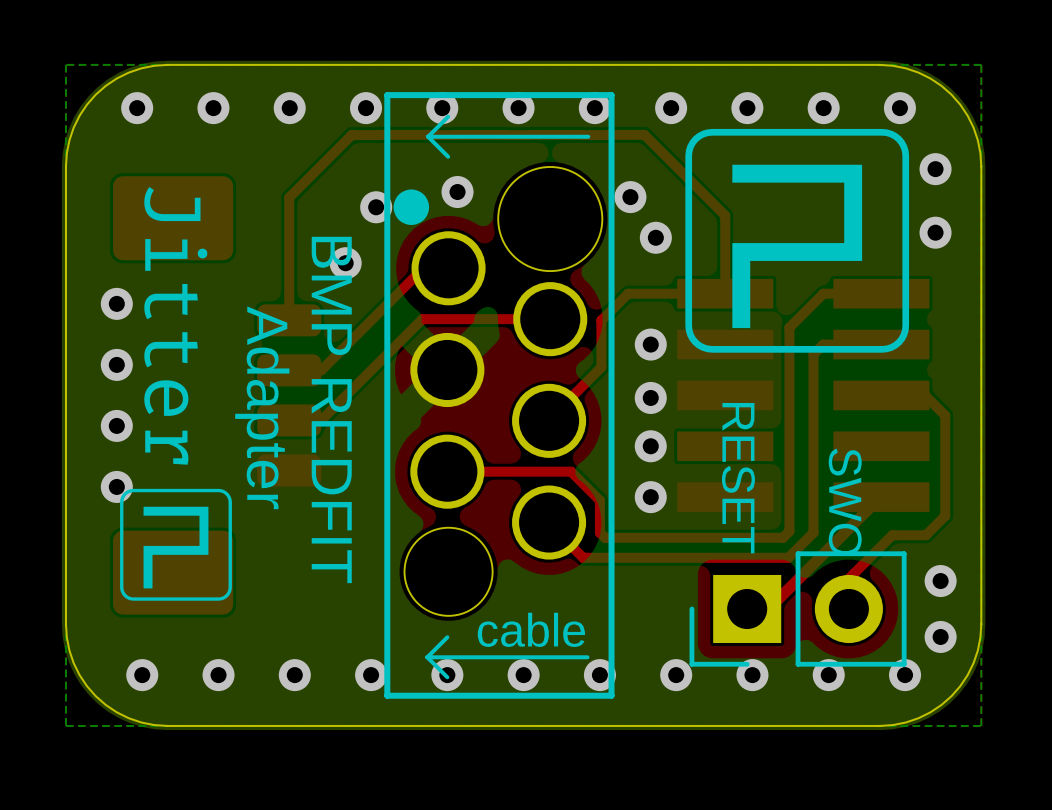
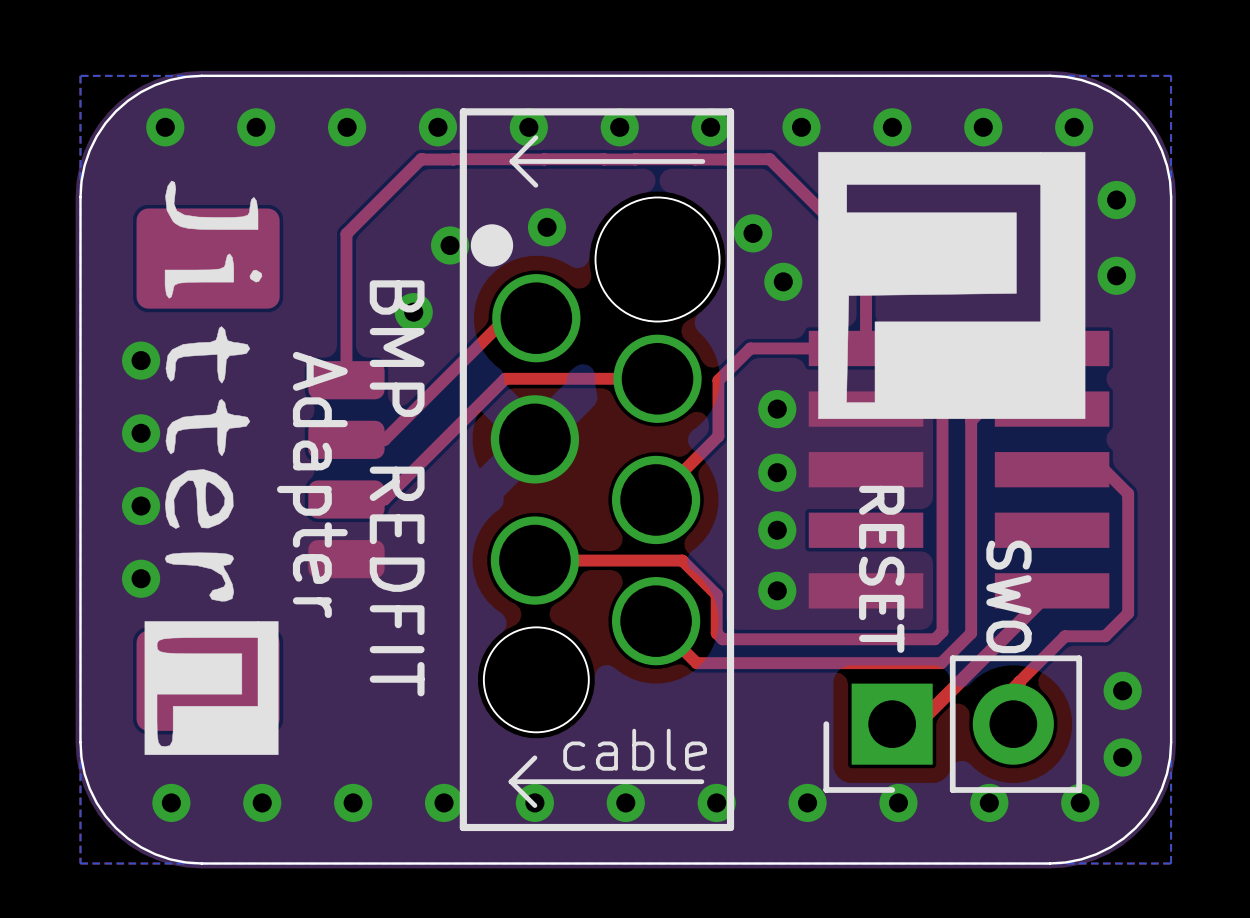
drawing shape: [685, 128, 910, 353] -> [818, 151, 1086, 420]
drawing shape: [120, 187, 232, 601] -> [144, 180, 279, 755]

